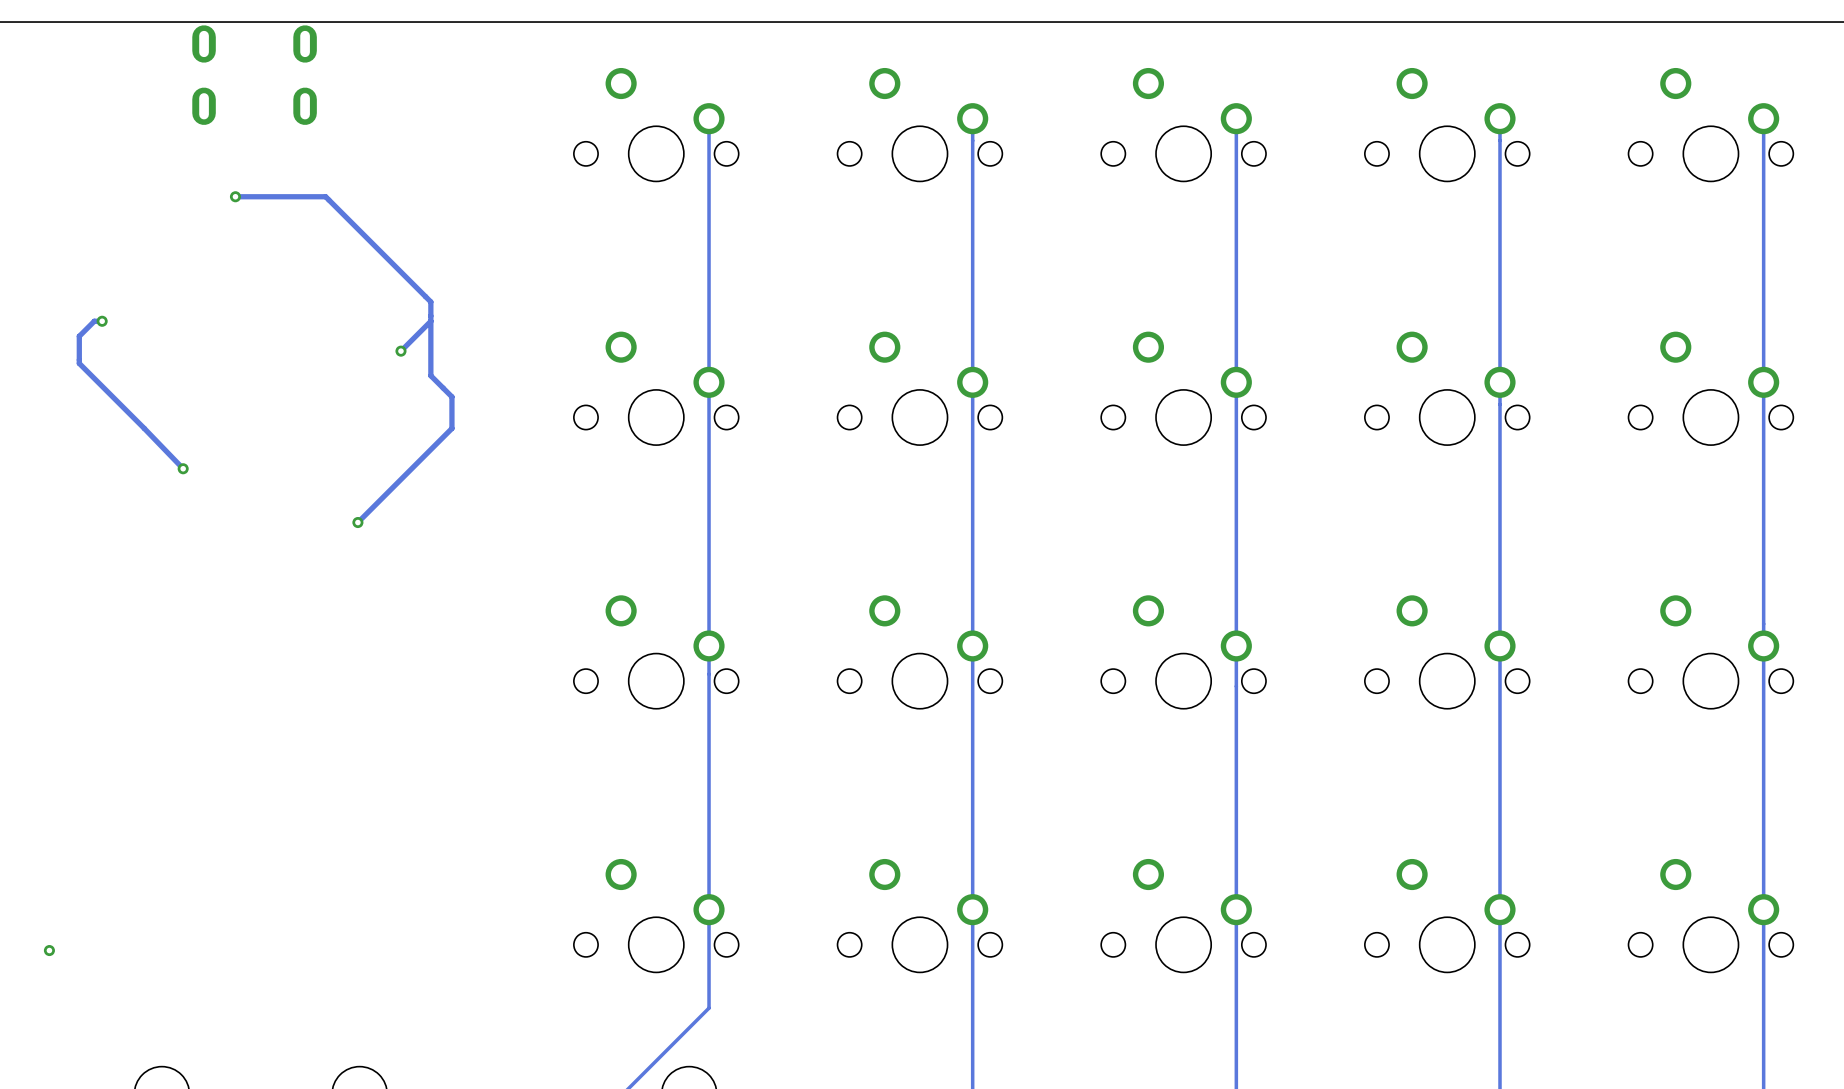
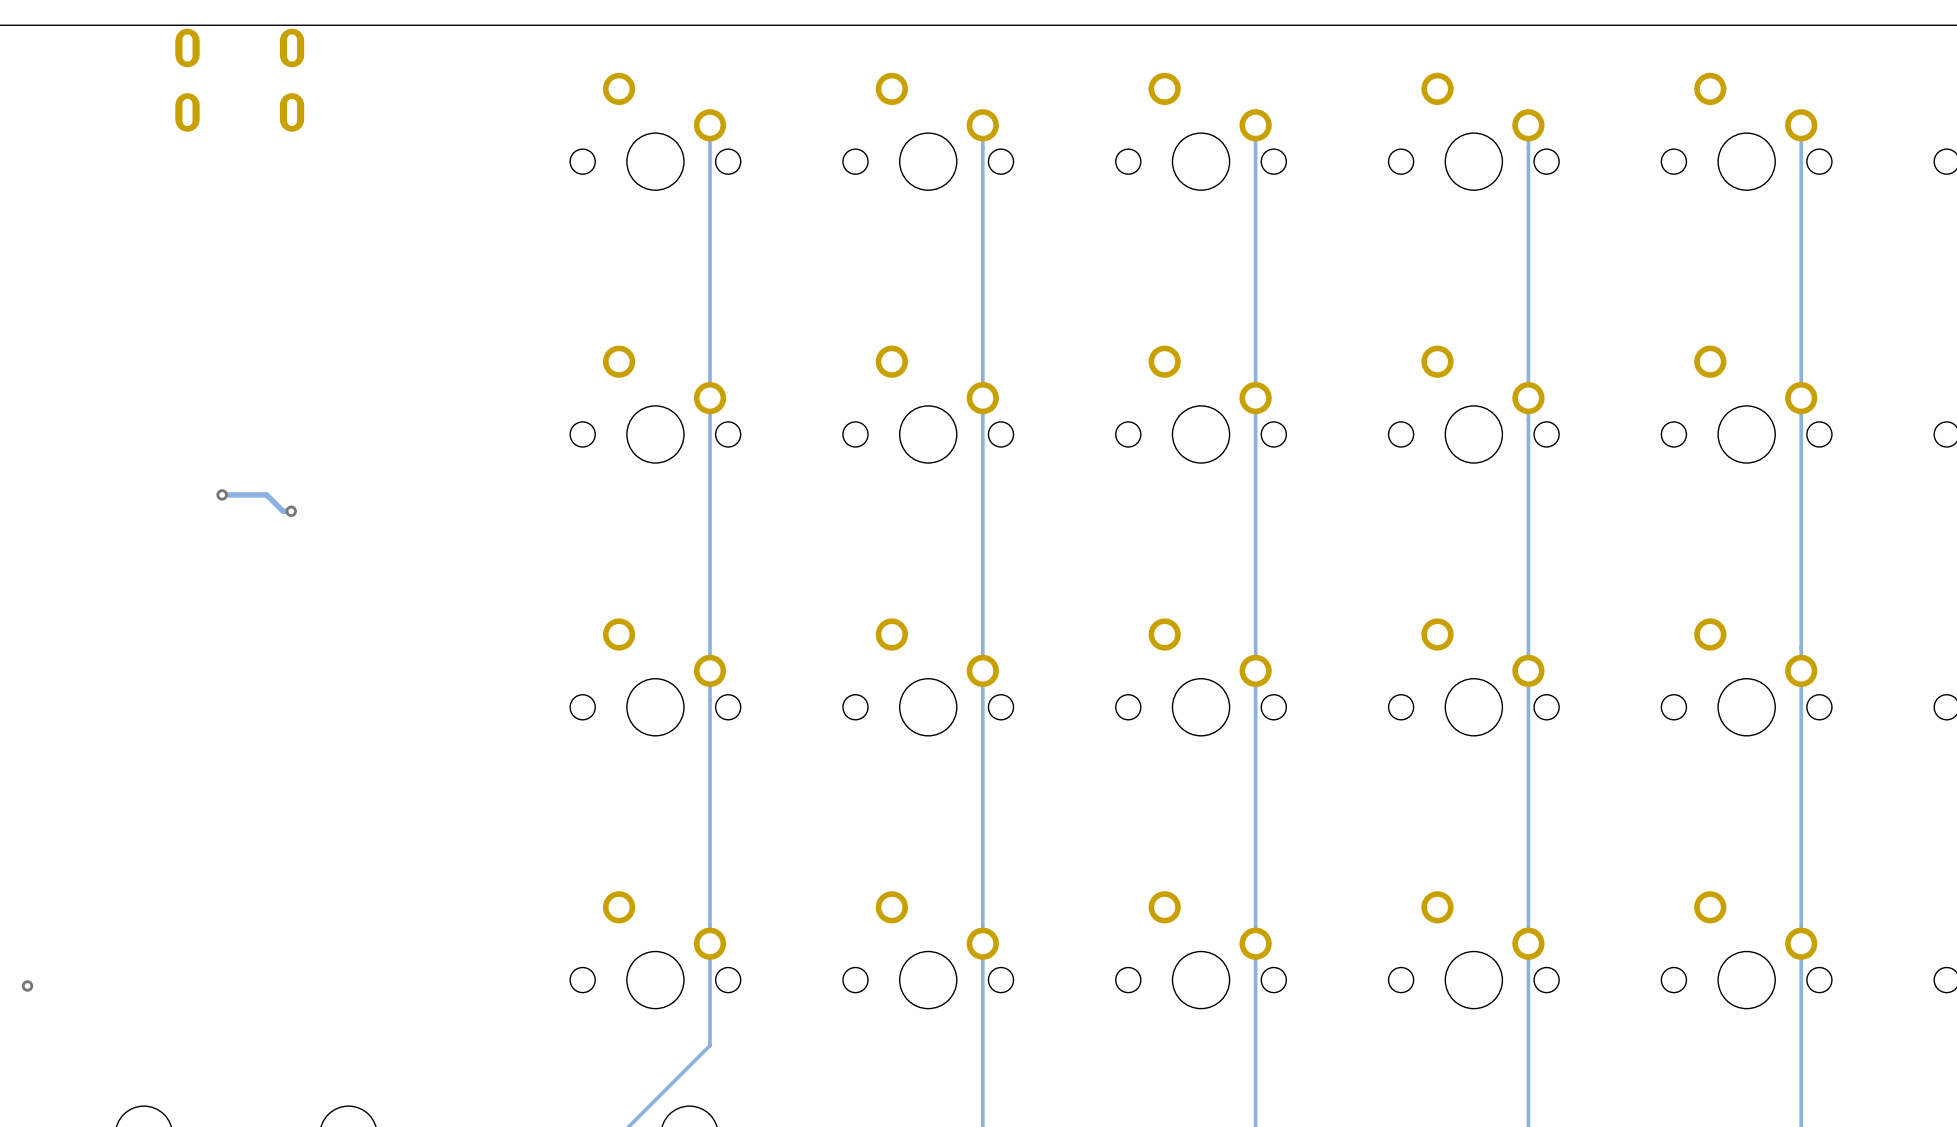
track: (235, 196) (325, 196) (430, 301) (430, 375) (451, 396) (451, 428) (357, 522) -> none
via: (235, 196) -> none
track: (102, 321) (94, 321) (79, 336) (79, 363) (183, 468) -> none
via: (102, 321) -> none
track: (430, 321) (400, 351) -> none
via: (400, 351) -> none
via position: (183, 468) -> (222, 494)
track: none -> (222, 494) (266, 494) (283, 511) (291, 511)
via: none -> (291, 511)
via: (357, 522) -> none

